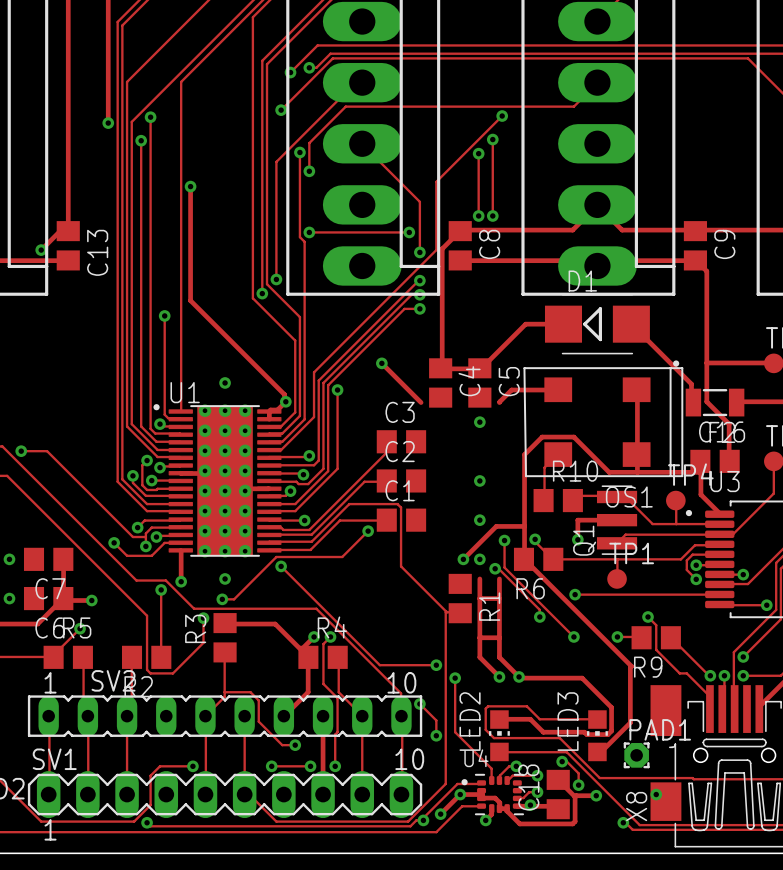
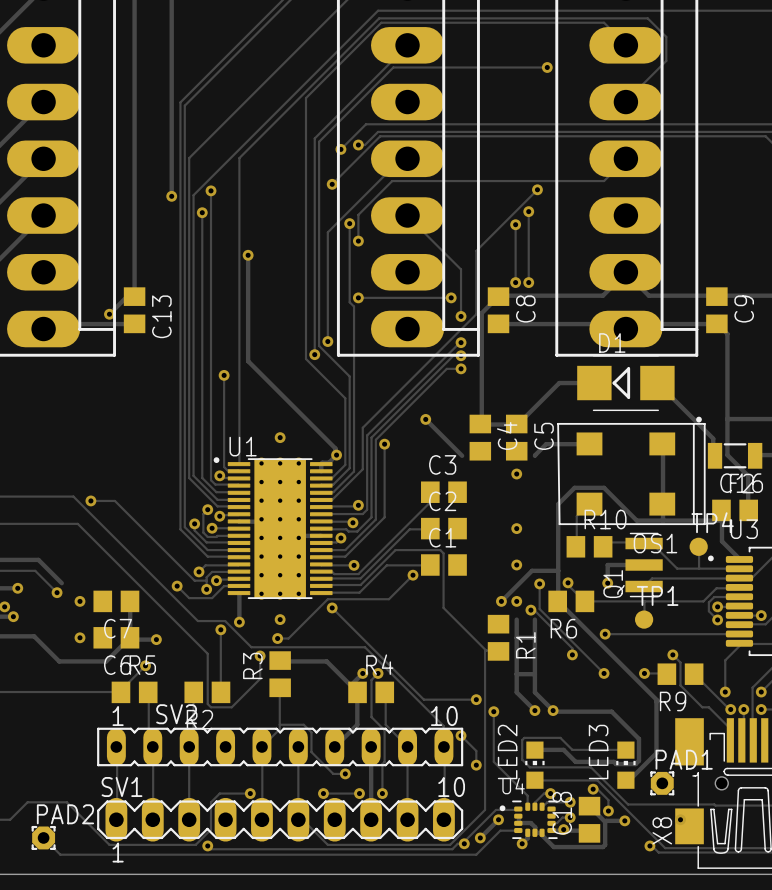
track: none -> (739, 643) (740, 645) (725, 660) (725, 692)
via: none -> (725, 692)
track: (460, 794) (482, 794) -> none

